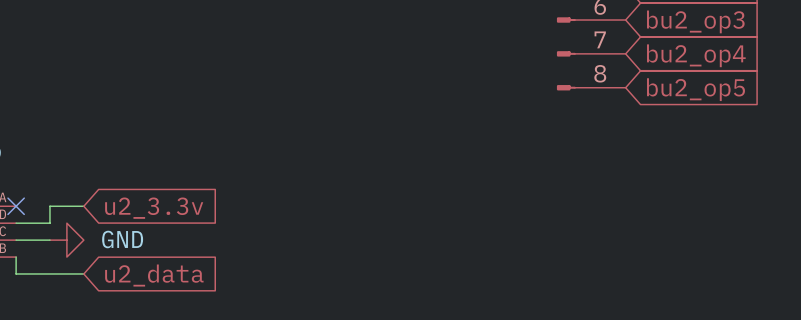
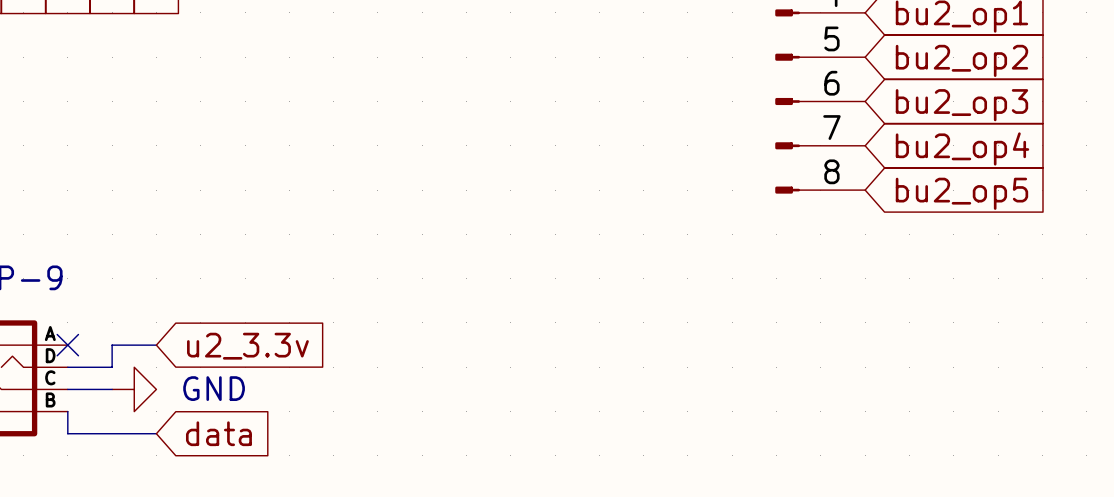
global label: u2_data (154, 275) -> data (218, 433)

